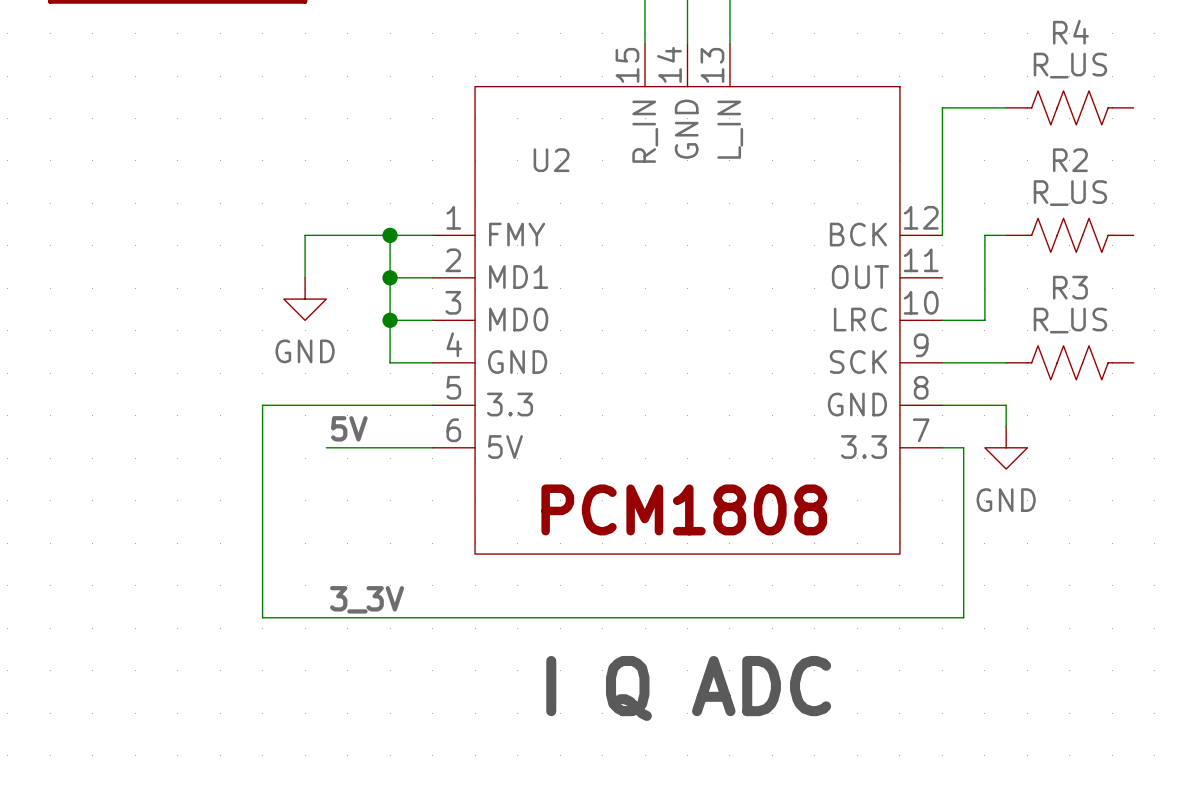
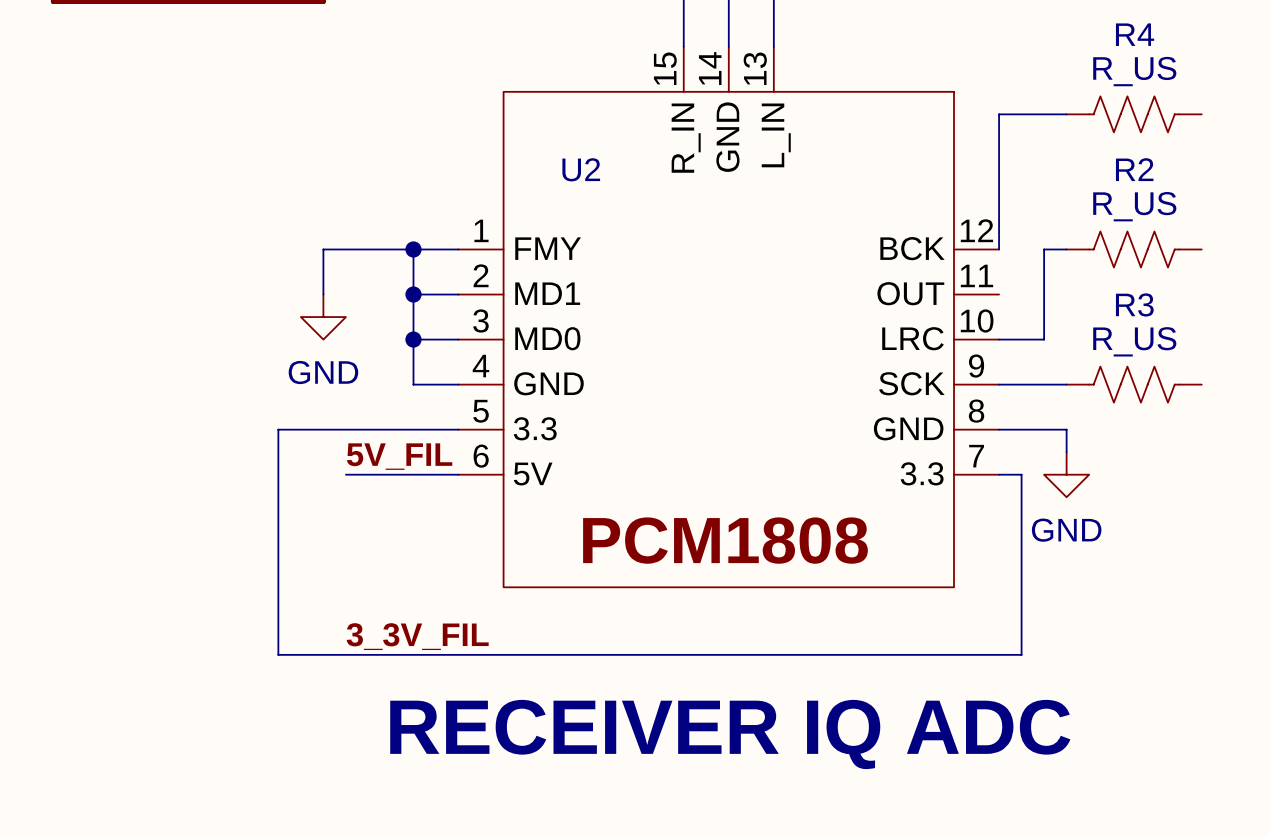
label: 5V (349, 428) -> 5V_FIL (399, 456)
label: 3_3V (367, 599) -> 3_3V_FIL (417, 636)
text: I Q ADC (688, 688) -> RECEIVER IQ ADC (730, 734)

